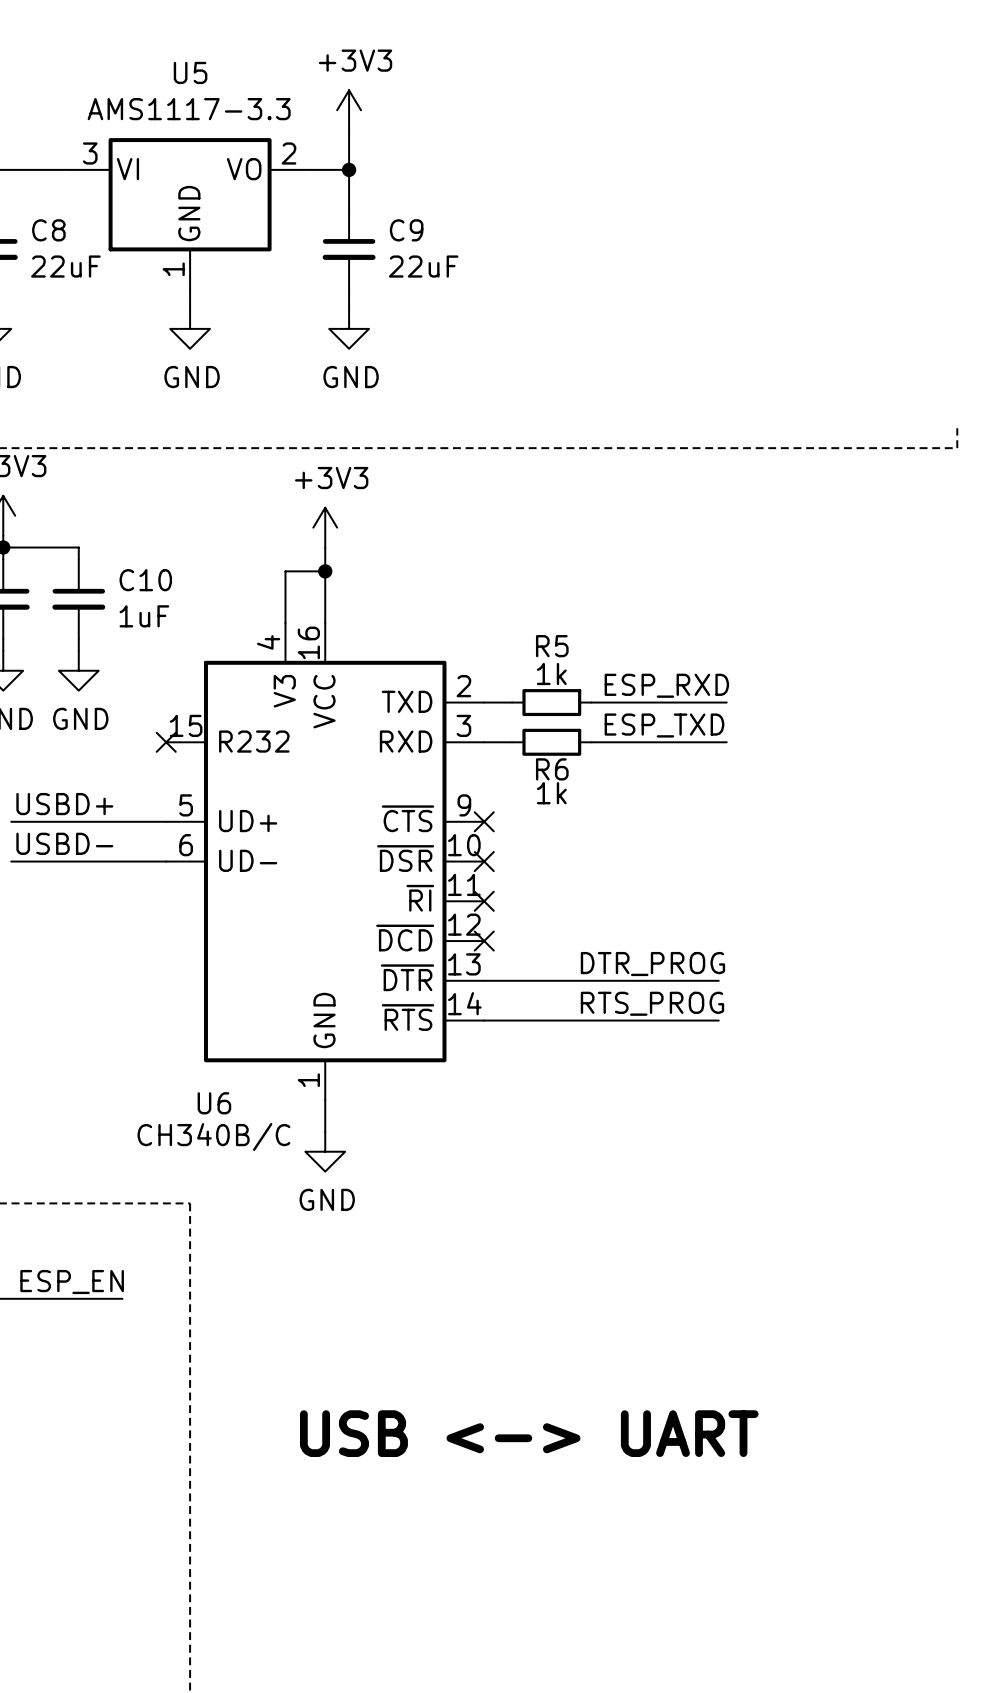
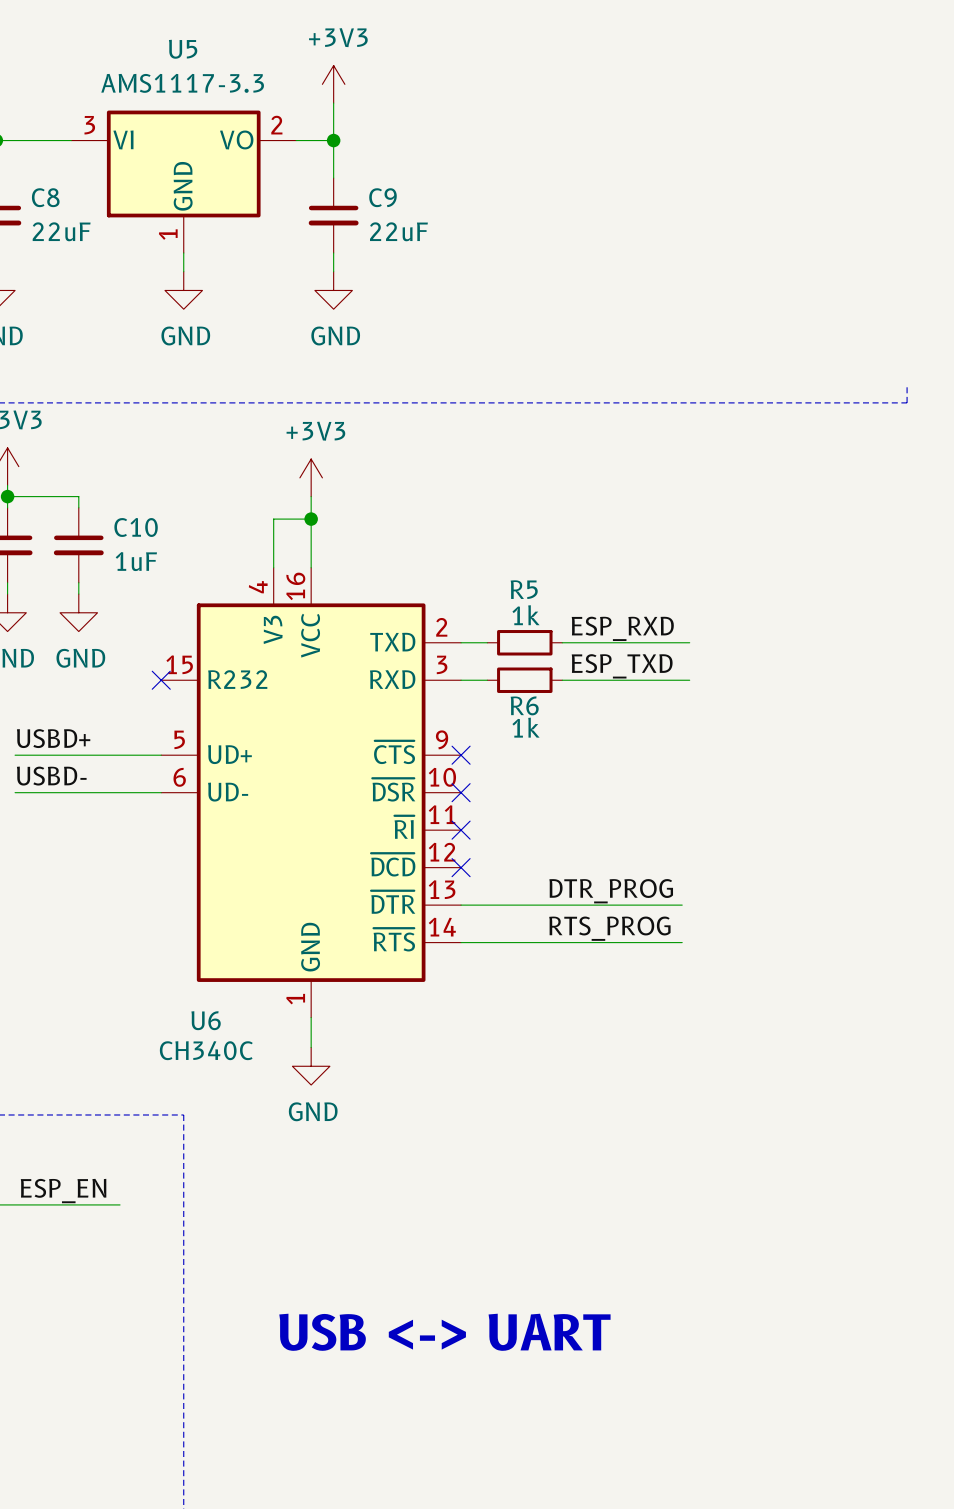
U6 value: CH340B/C (213, 1136) -> CH340C (206, 1050)

